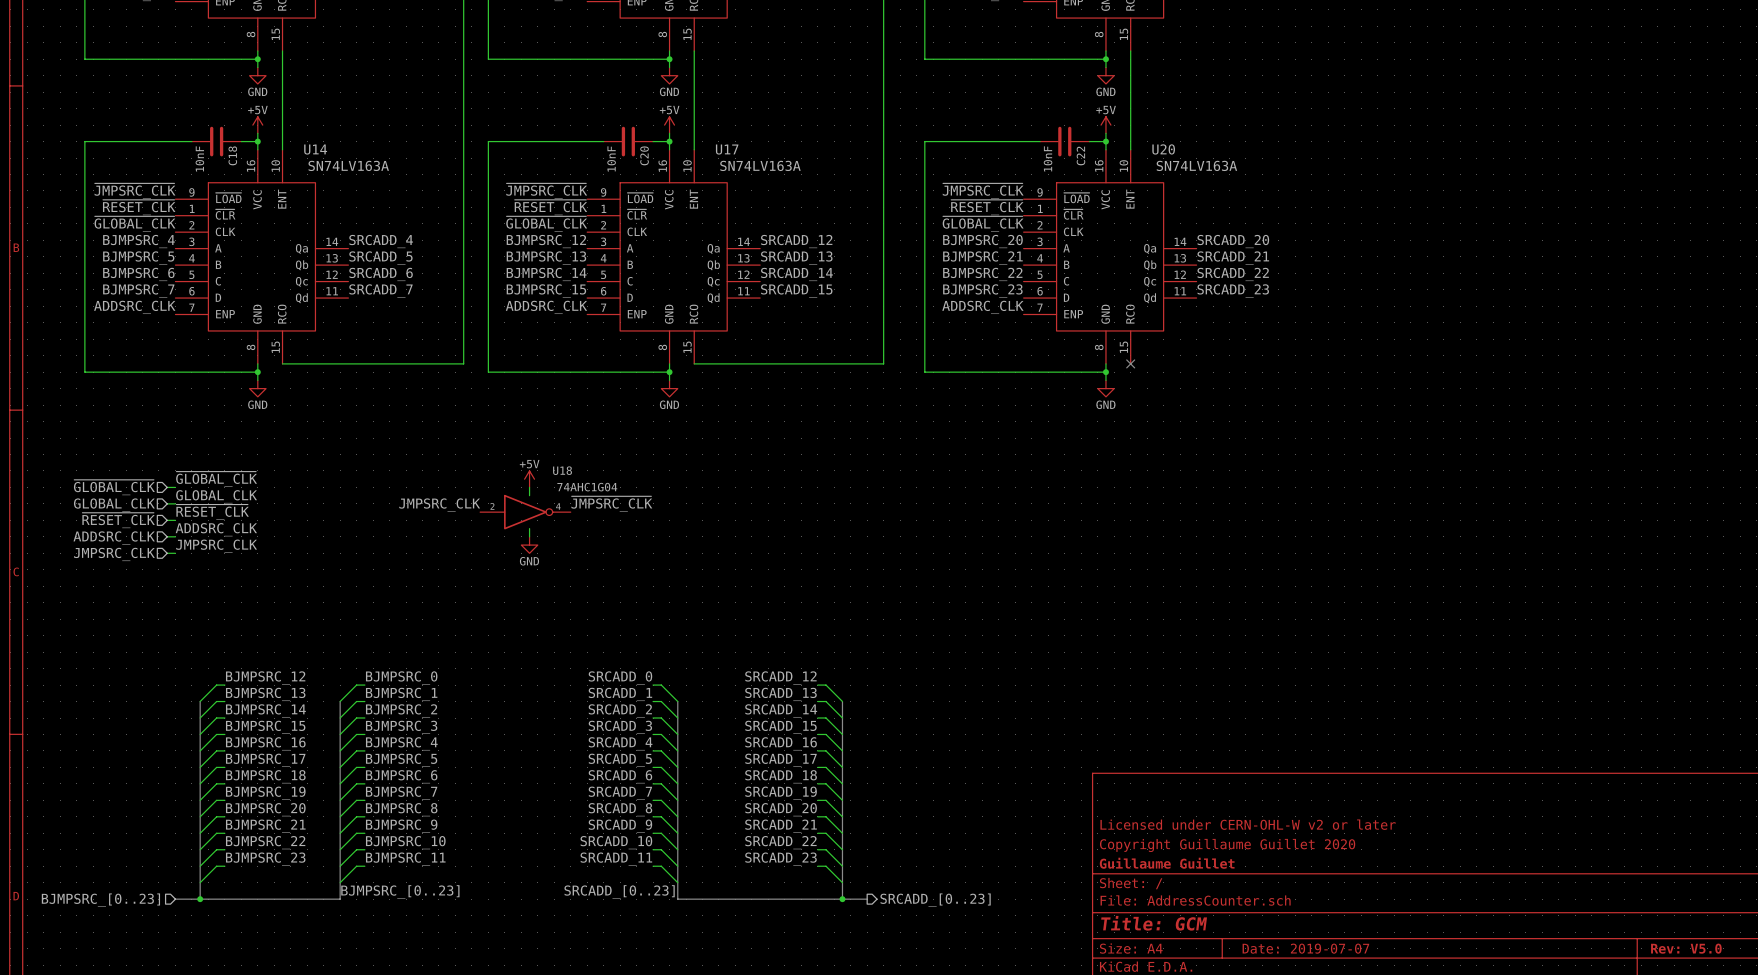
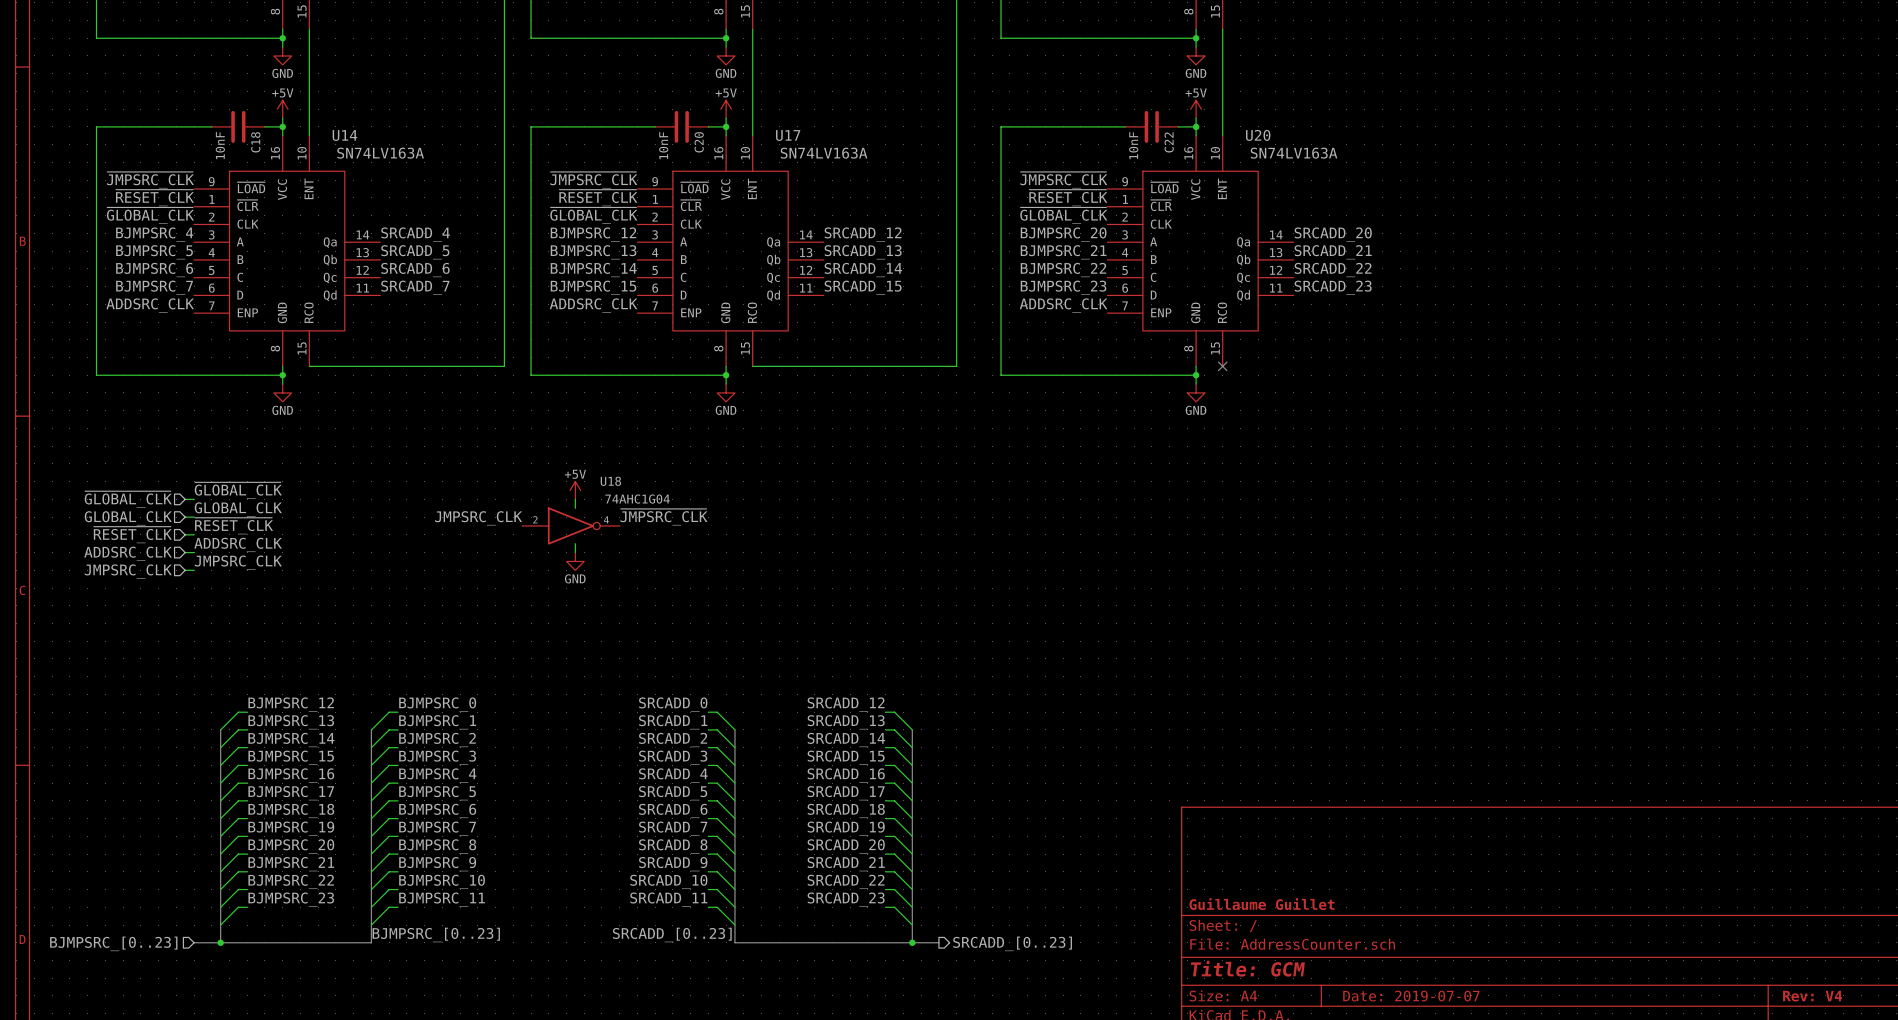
title block: Licensed under CERN-OHL-W v2 or later (1248, 824) -> none
title block: Copyright Guillaume Guillet 2020 (1227, 845) -> none
title block: Rev: V5.0 (1686, 948) -> Rev: V4 (1812, 996)

